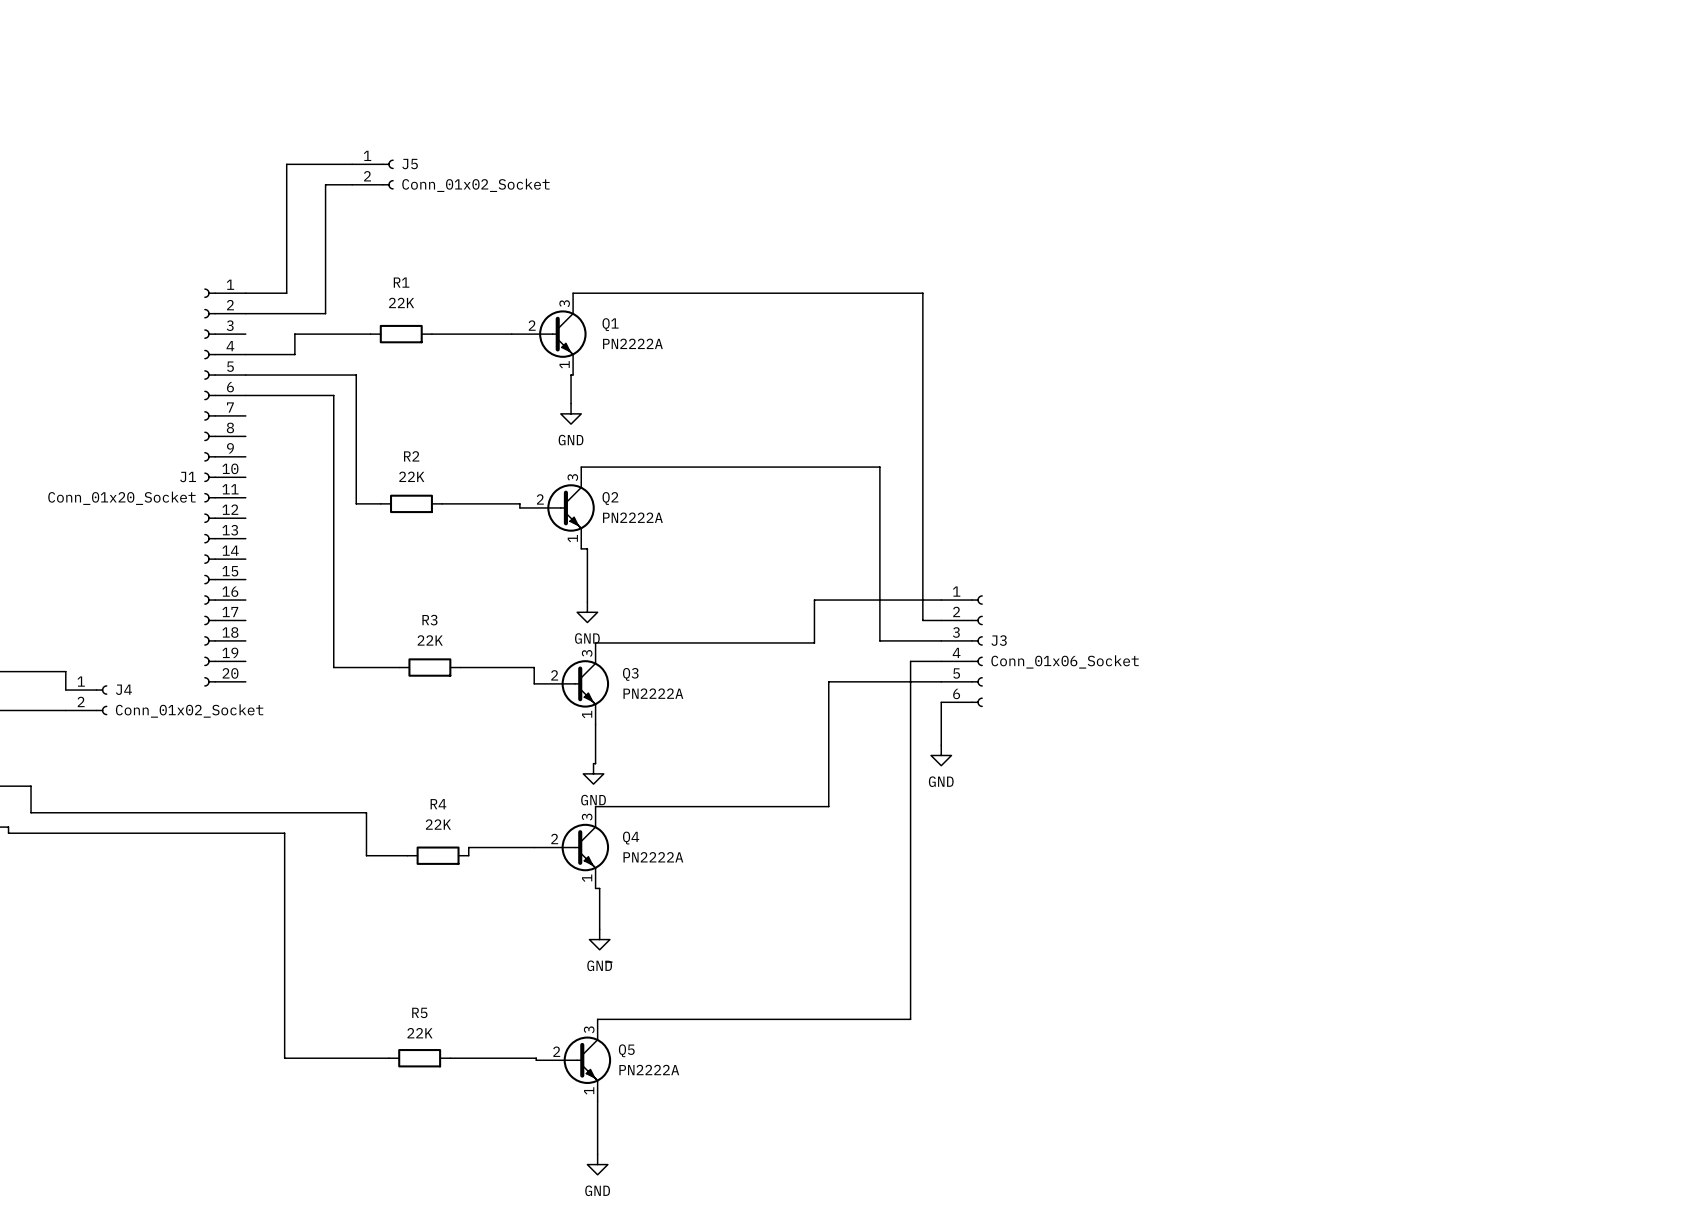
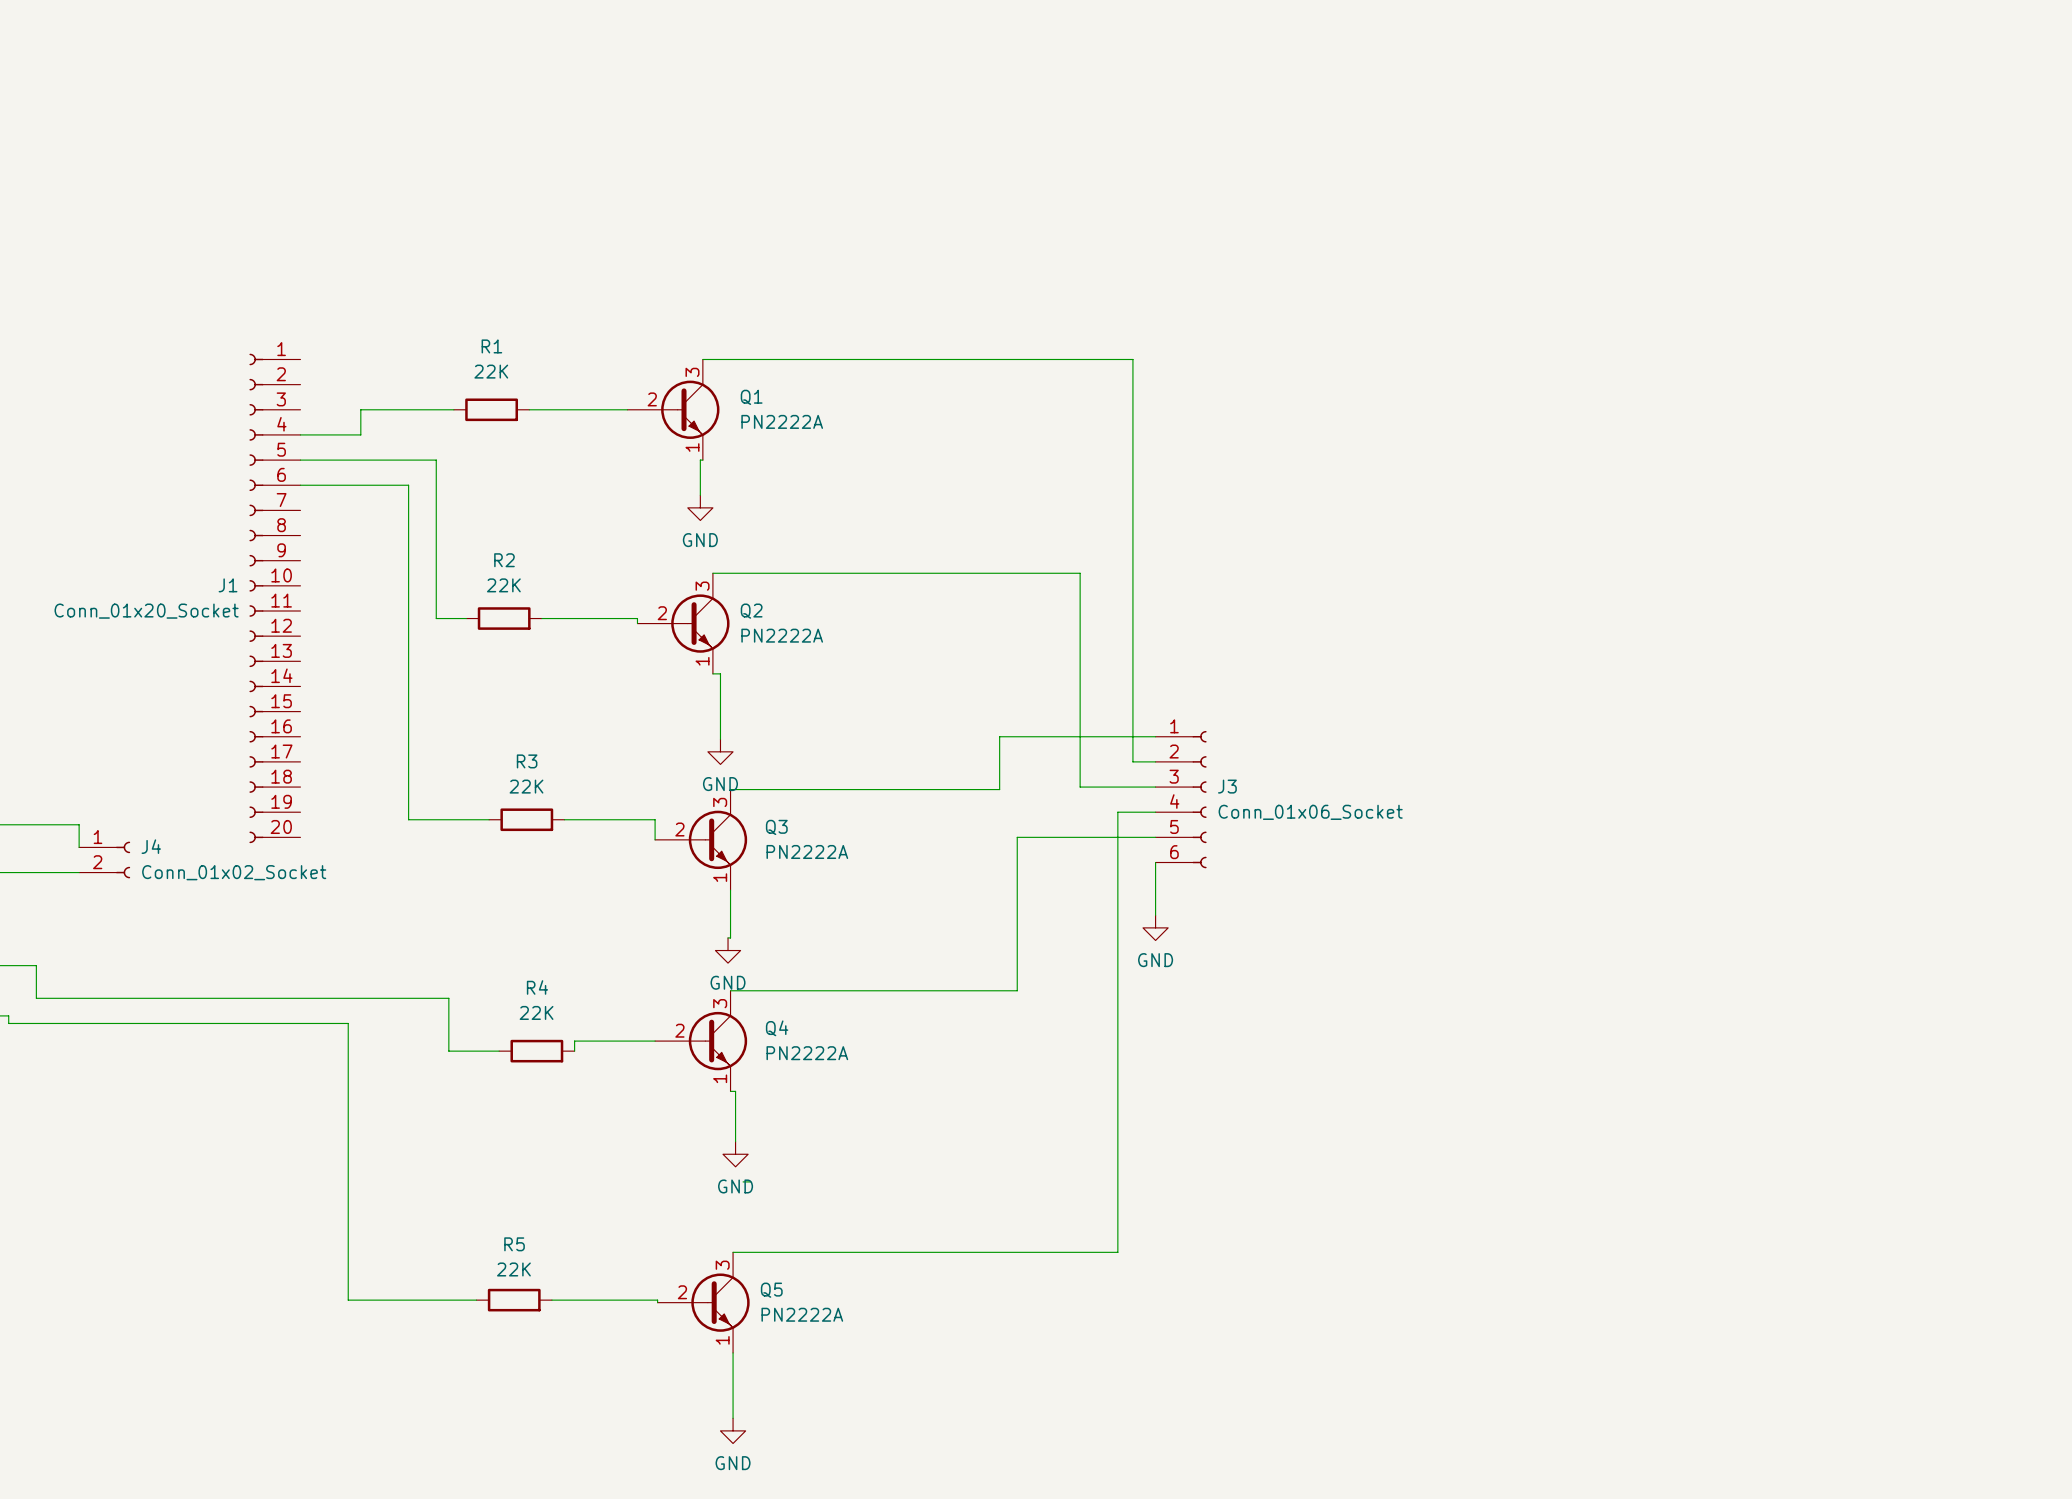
wire: (352, 164) (286, 164) (286, 293) (245, 293) -> none
J5: Conn_01x02_Socket (372, 174) -> none
wire: (352, 184) (325, 184) (325, 313) (245, 313) -> none

